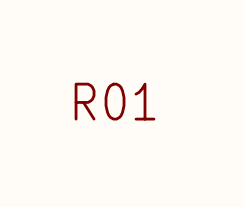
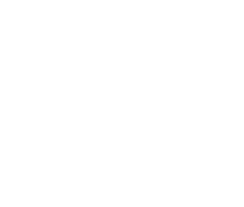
text: R01 (115, 101) -> none

